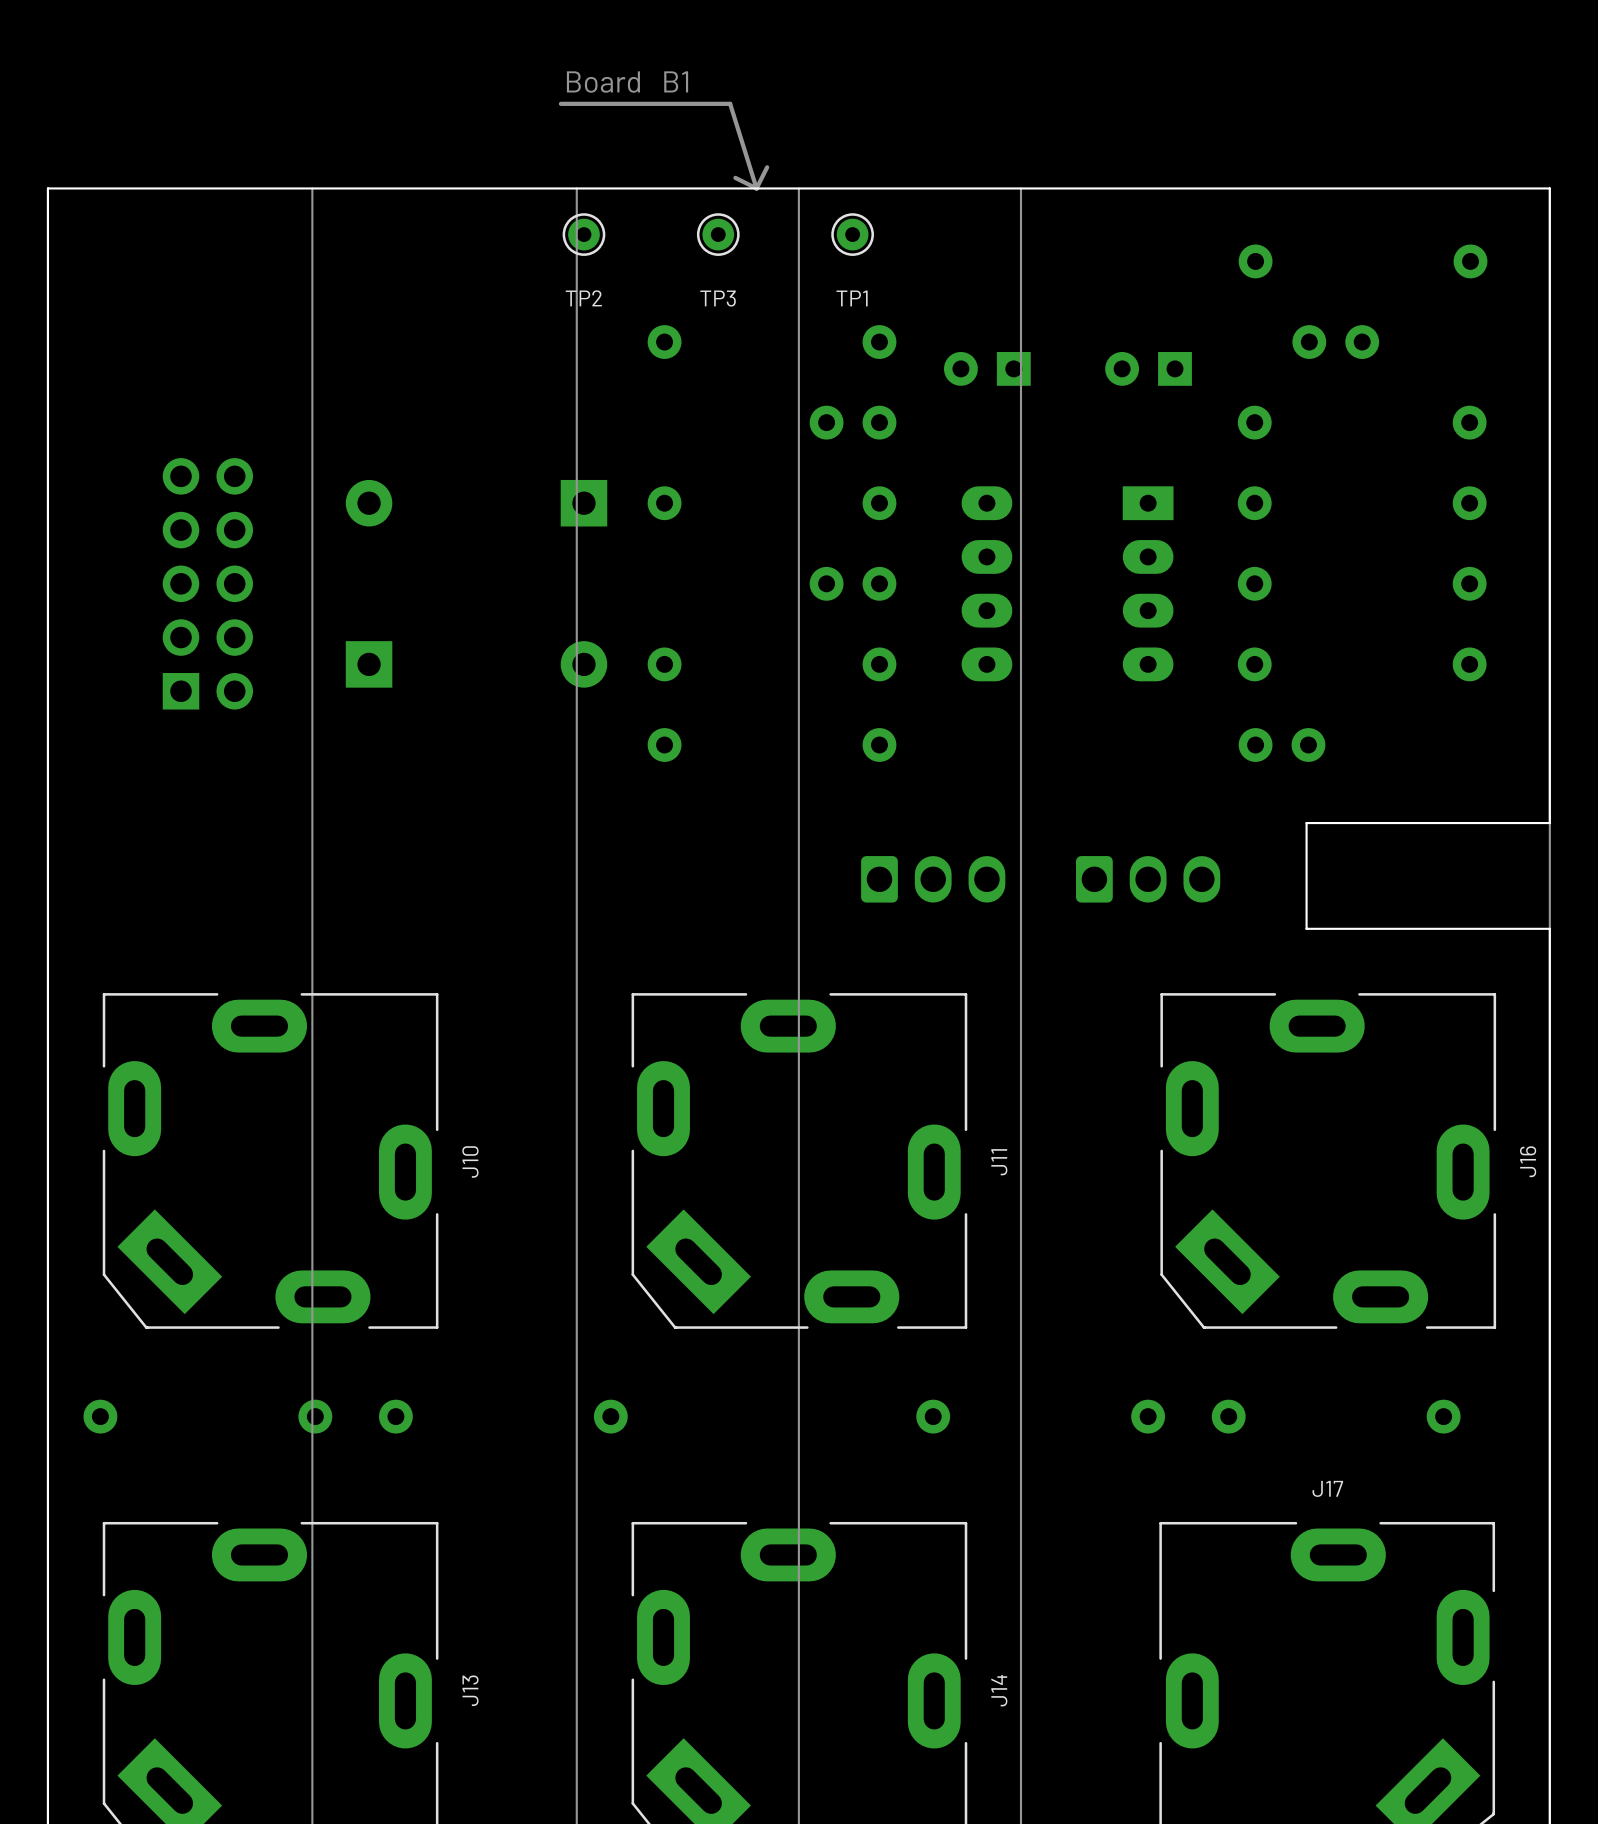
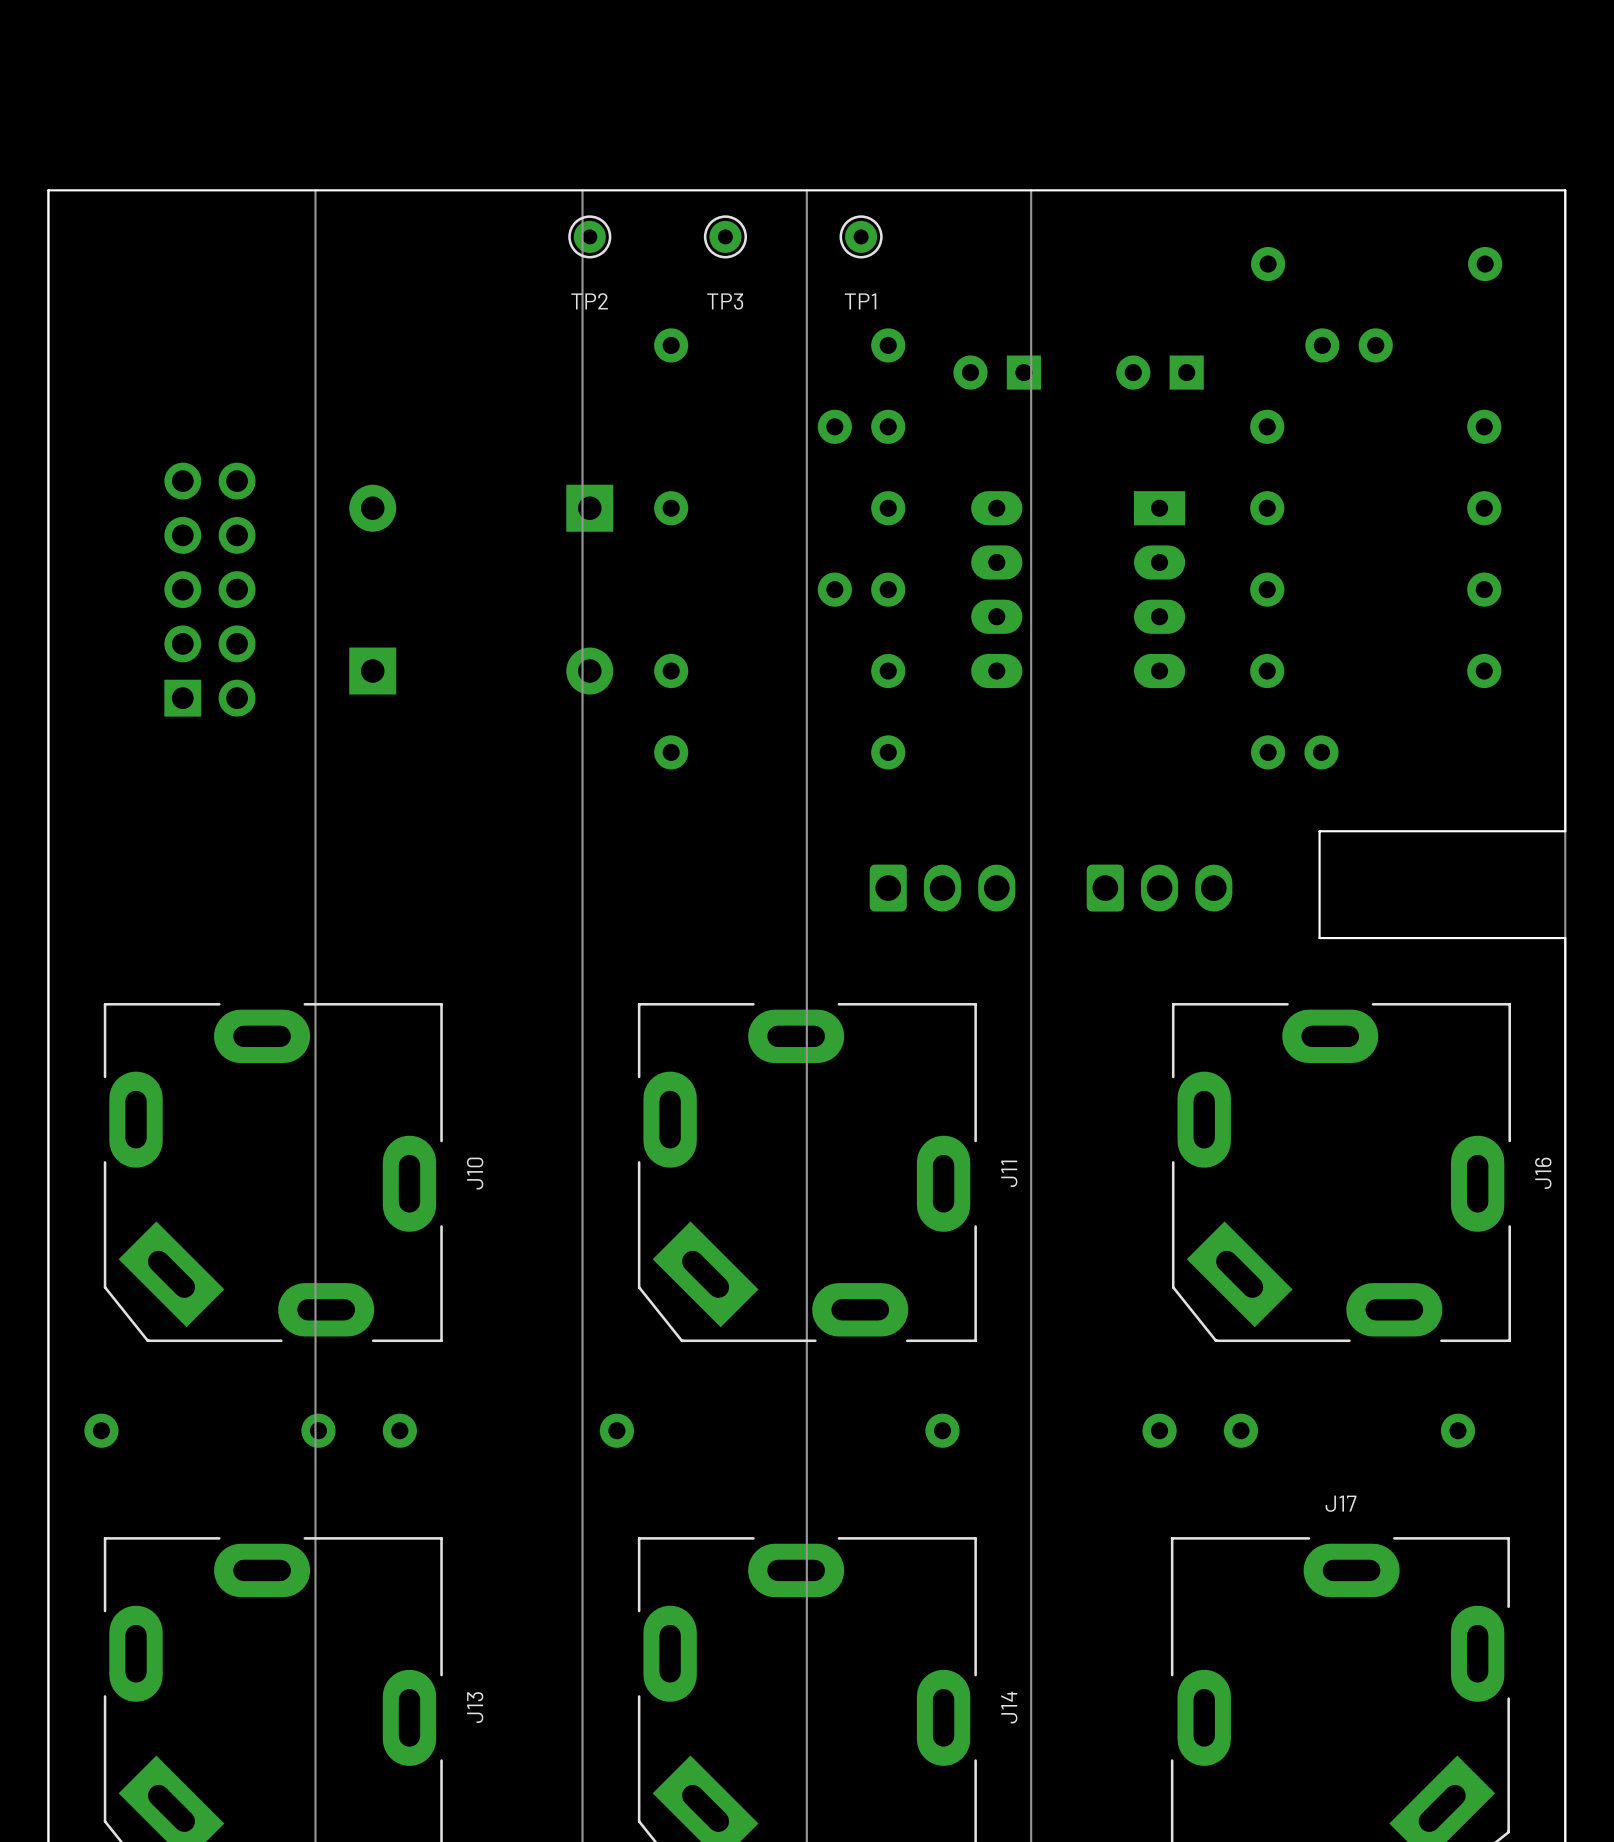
B1: Board (664, 146) -> none

